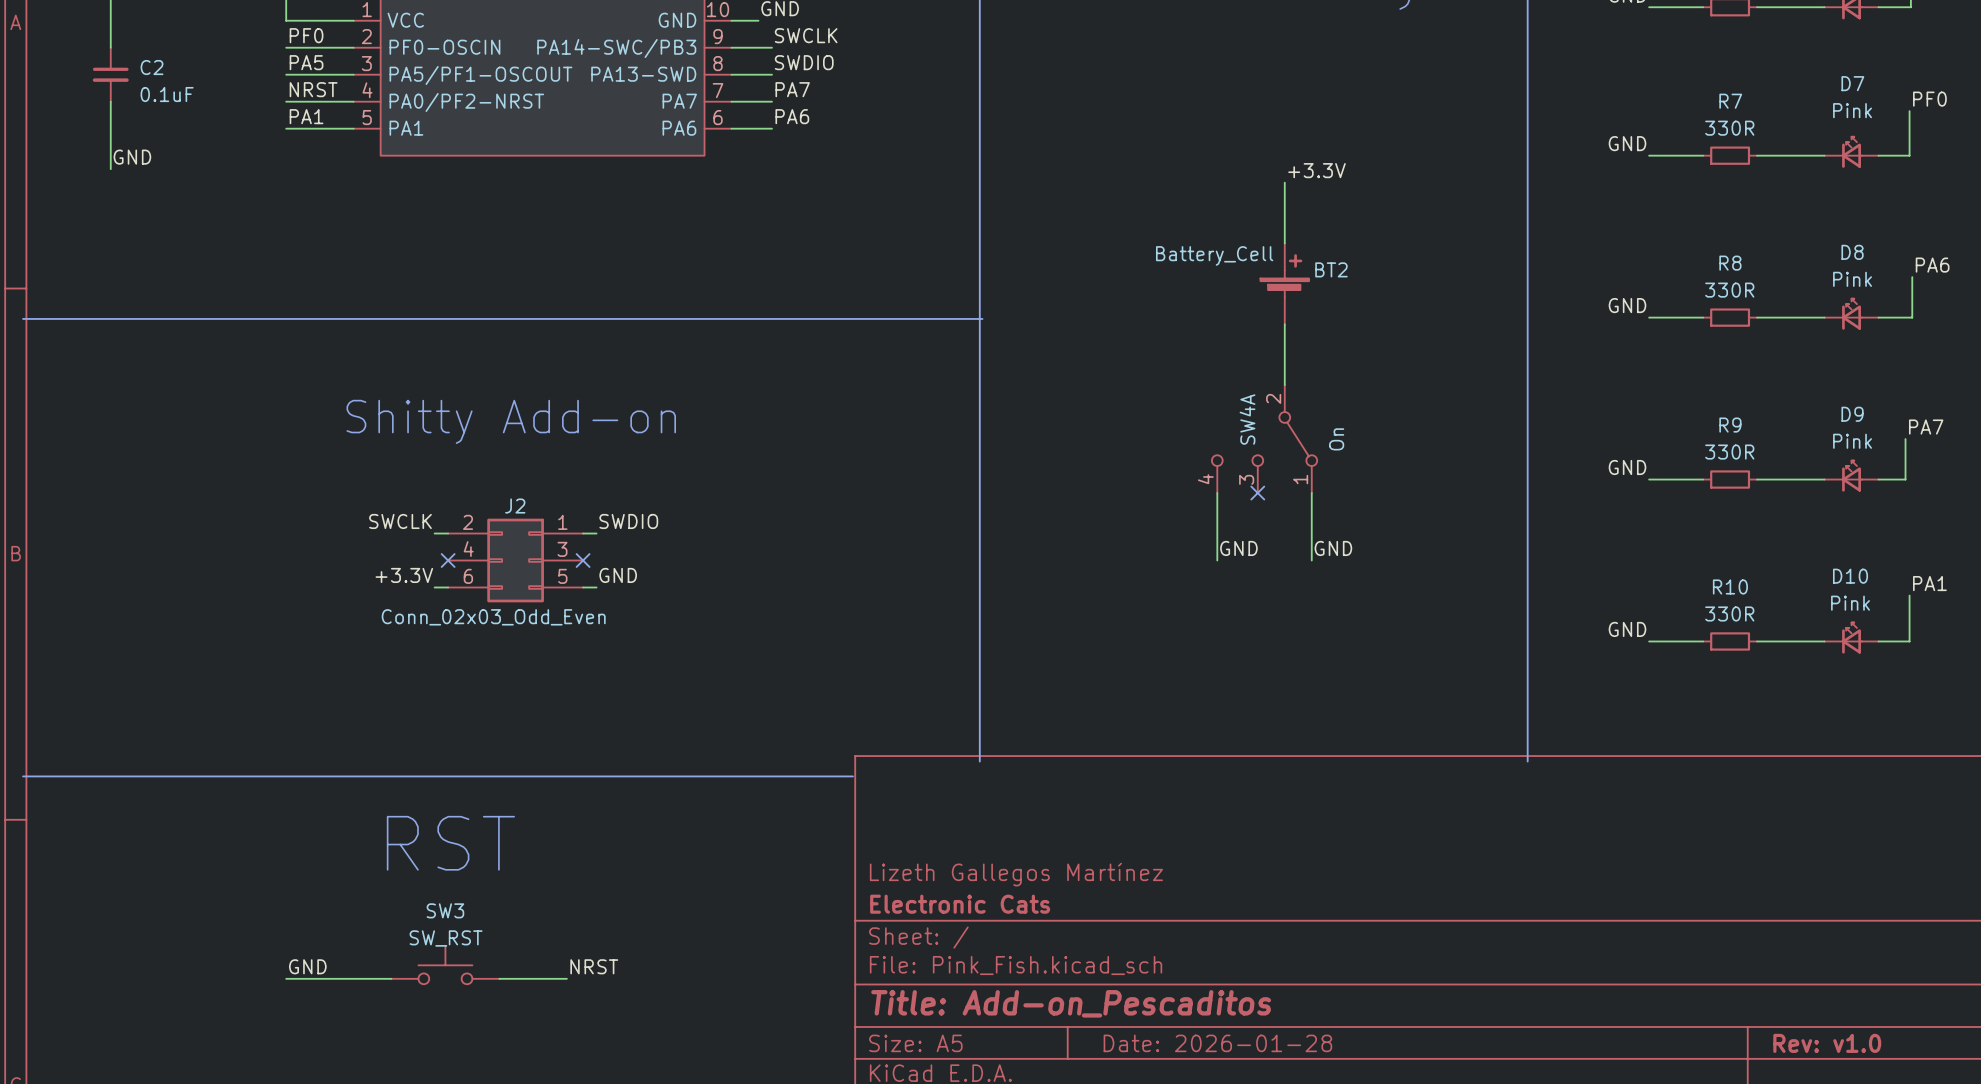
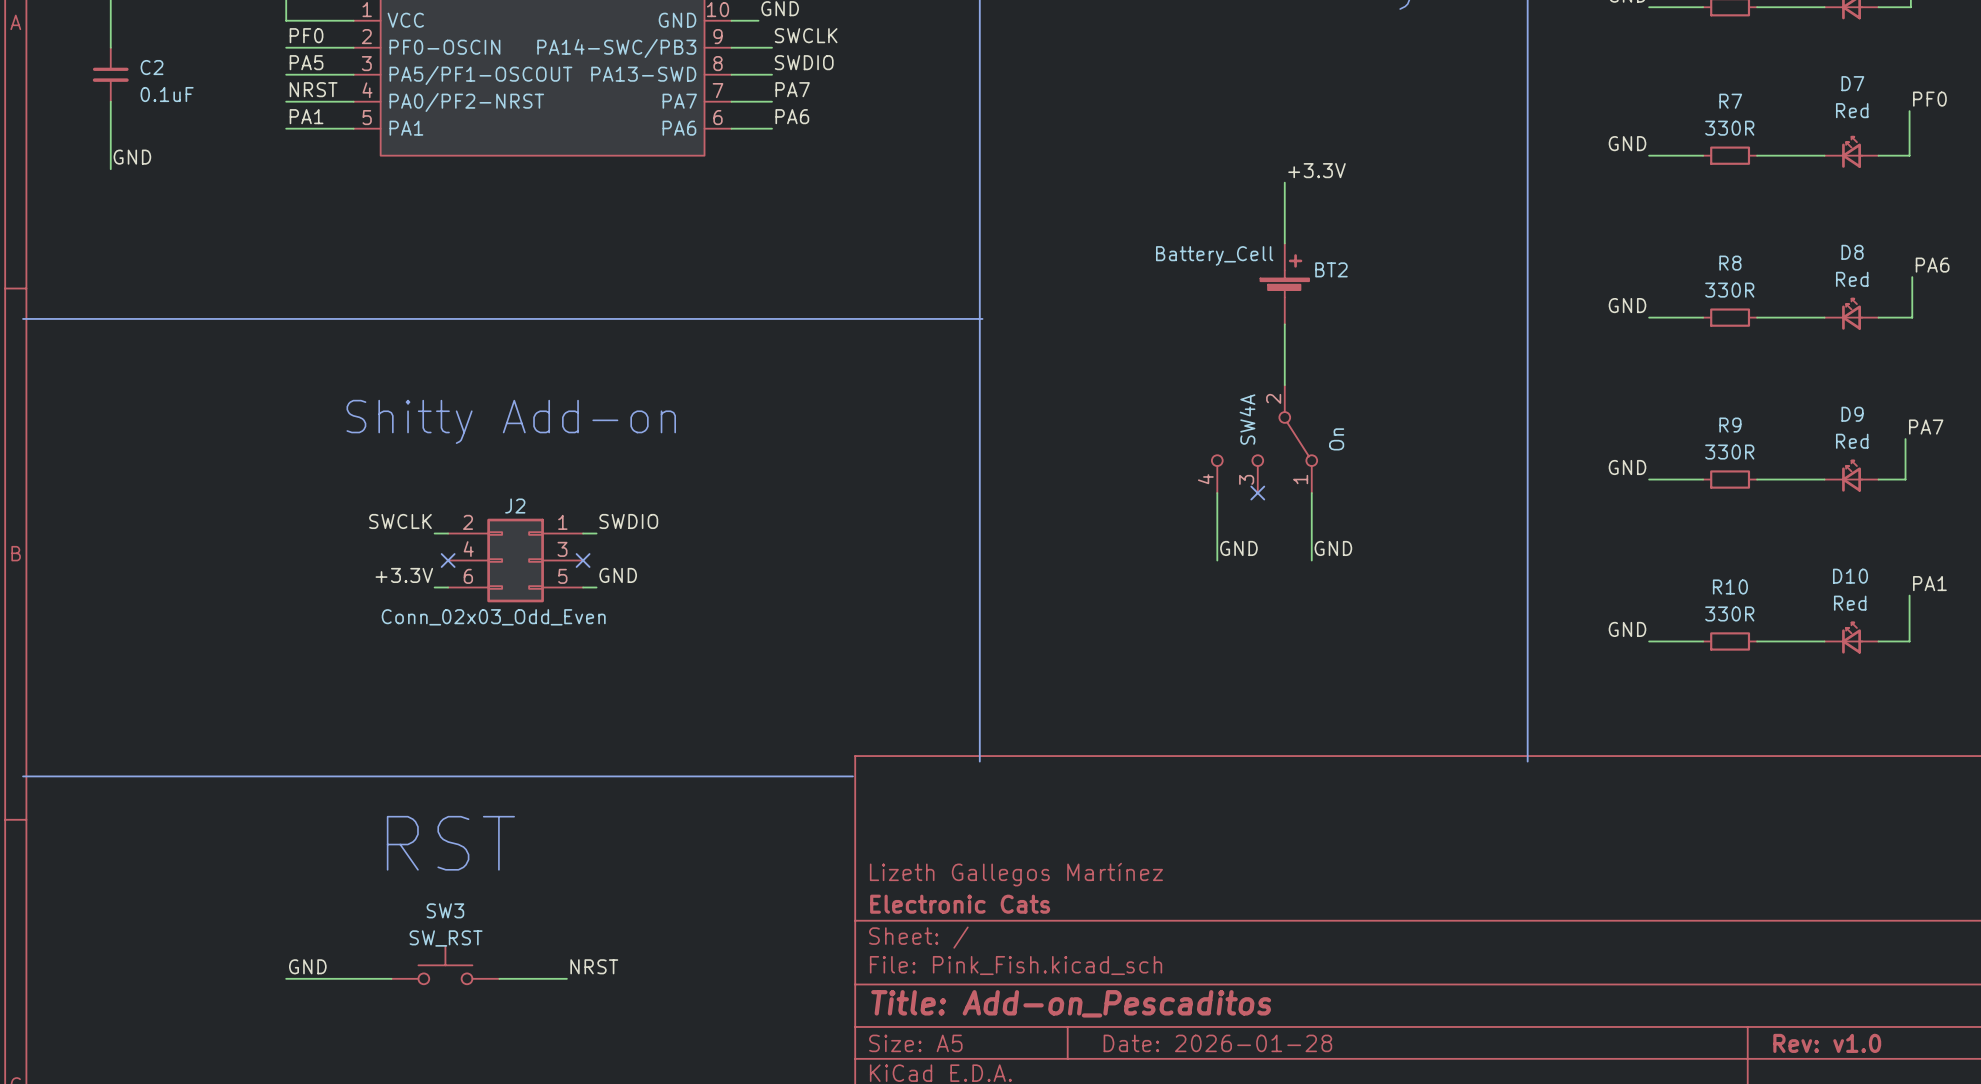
D7 value: Pink (1852, 110) -> Red (1852, 110)
D8 value: Pink (1852, 279) -> Red (1852, 279)
D9 value: Pink (1852, 441) -> Red (1852, 441)
D10 value: Pink (1850, 603) -> Red (1850, 603)

